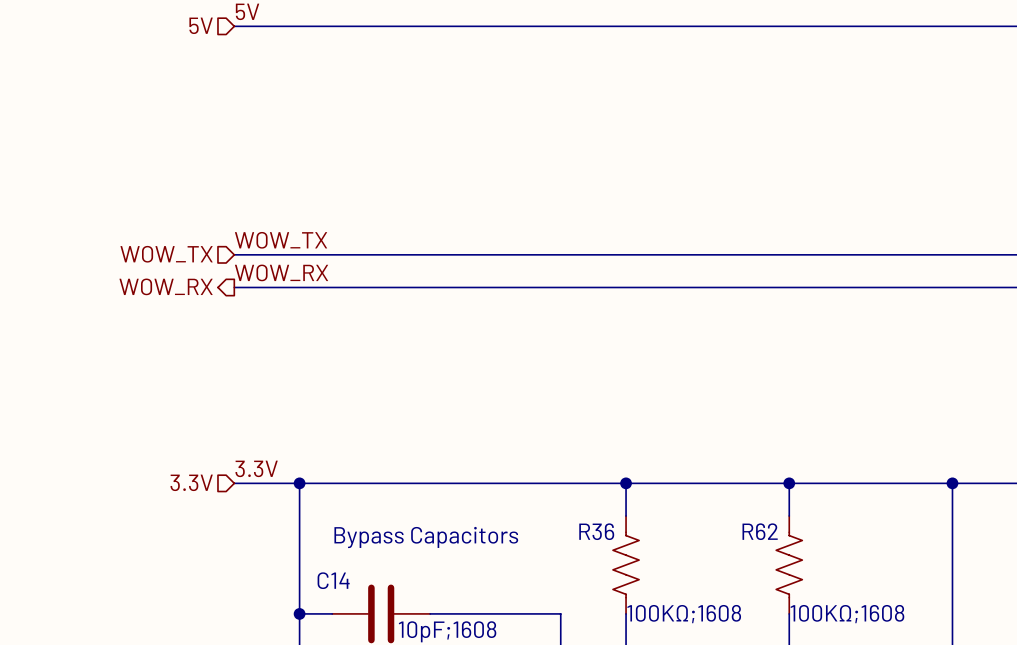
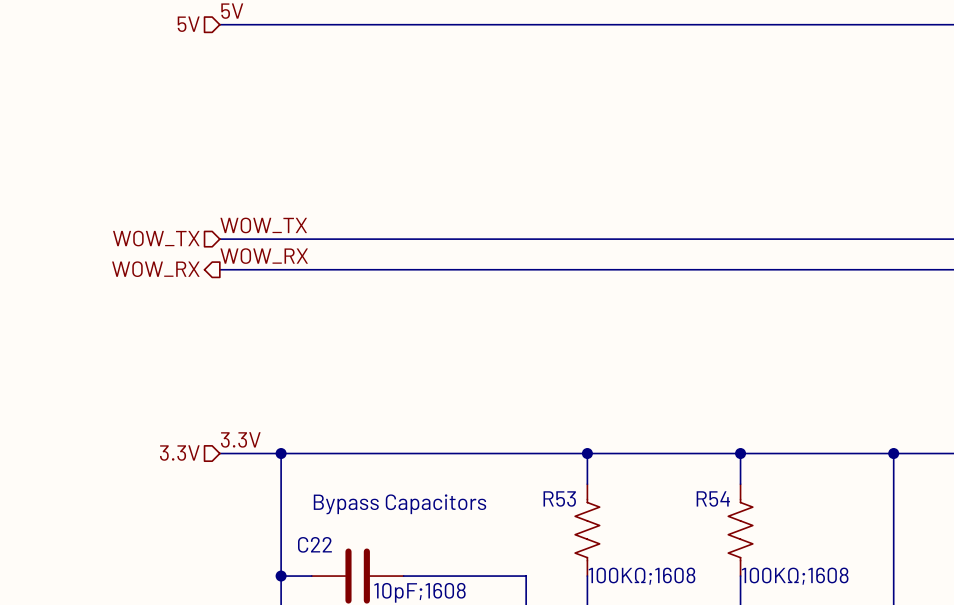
R36 name: R36 (596, 531) -> R53 (559, 498)
R62 name: R62 (760, 531) -> R54 (713, 498)
C14 name: C14 (333, 580) -> C22 (314, 544)

